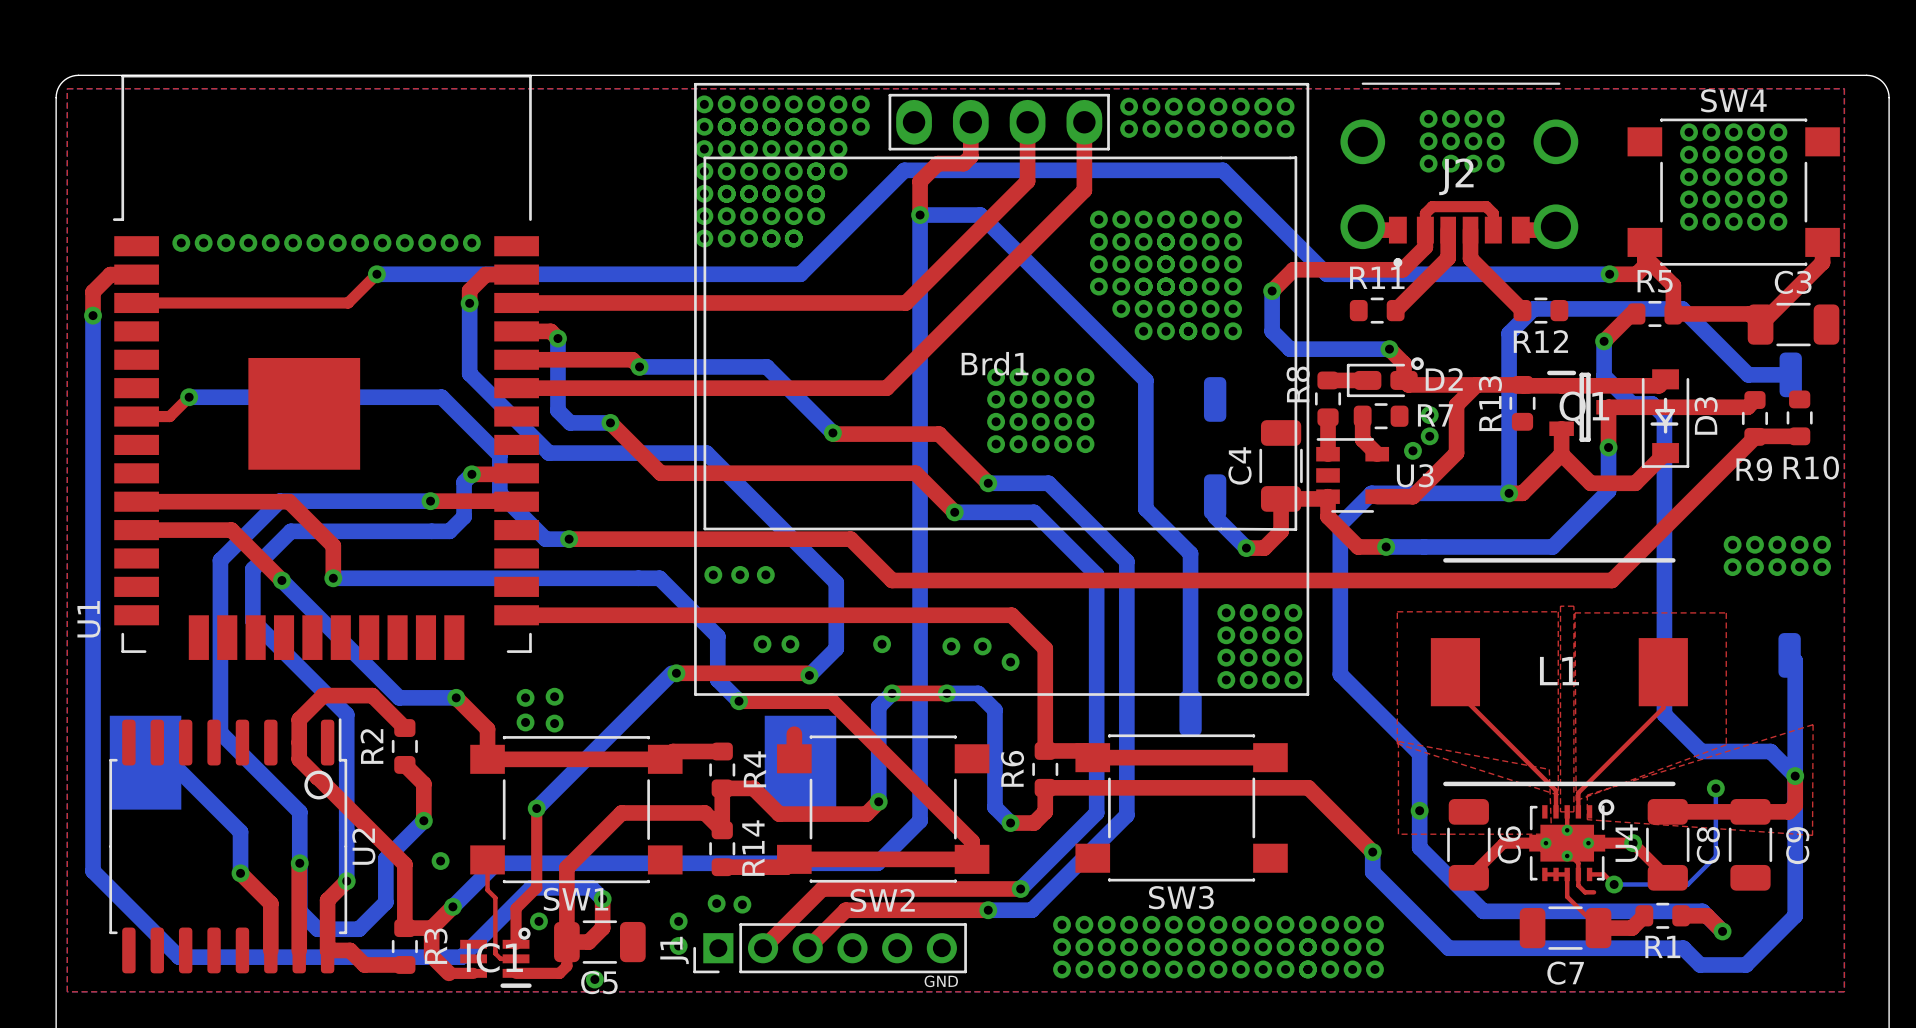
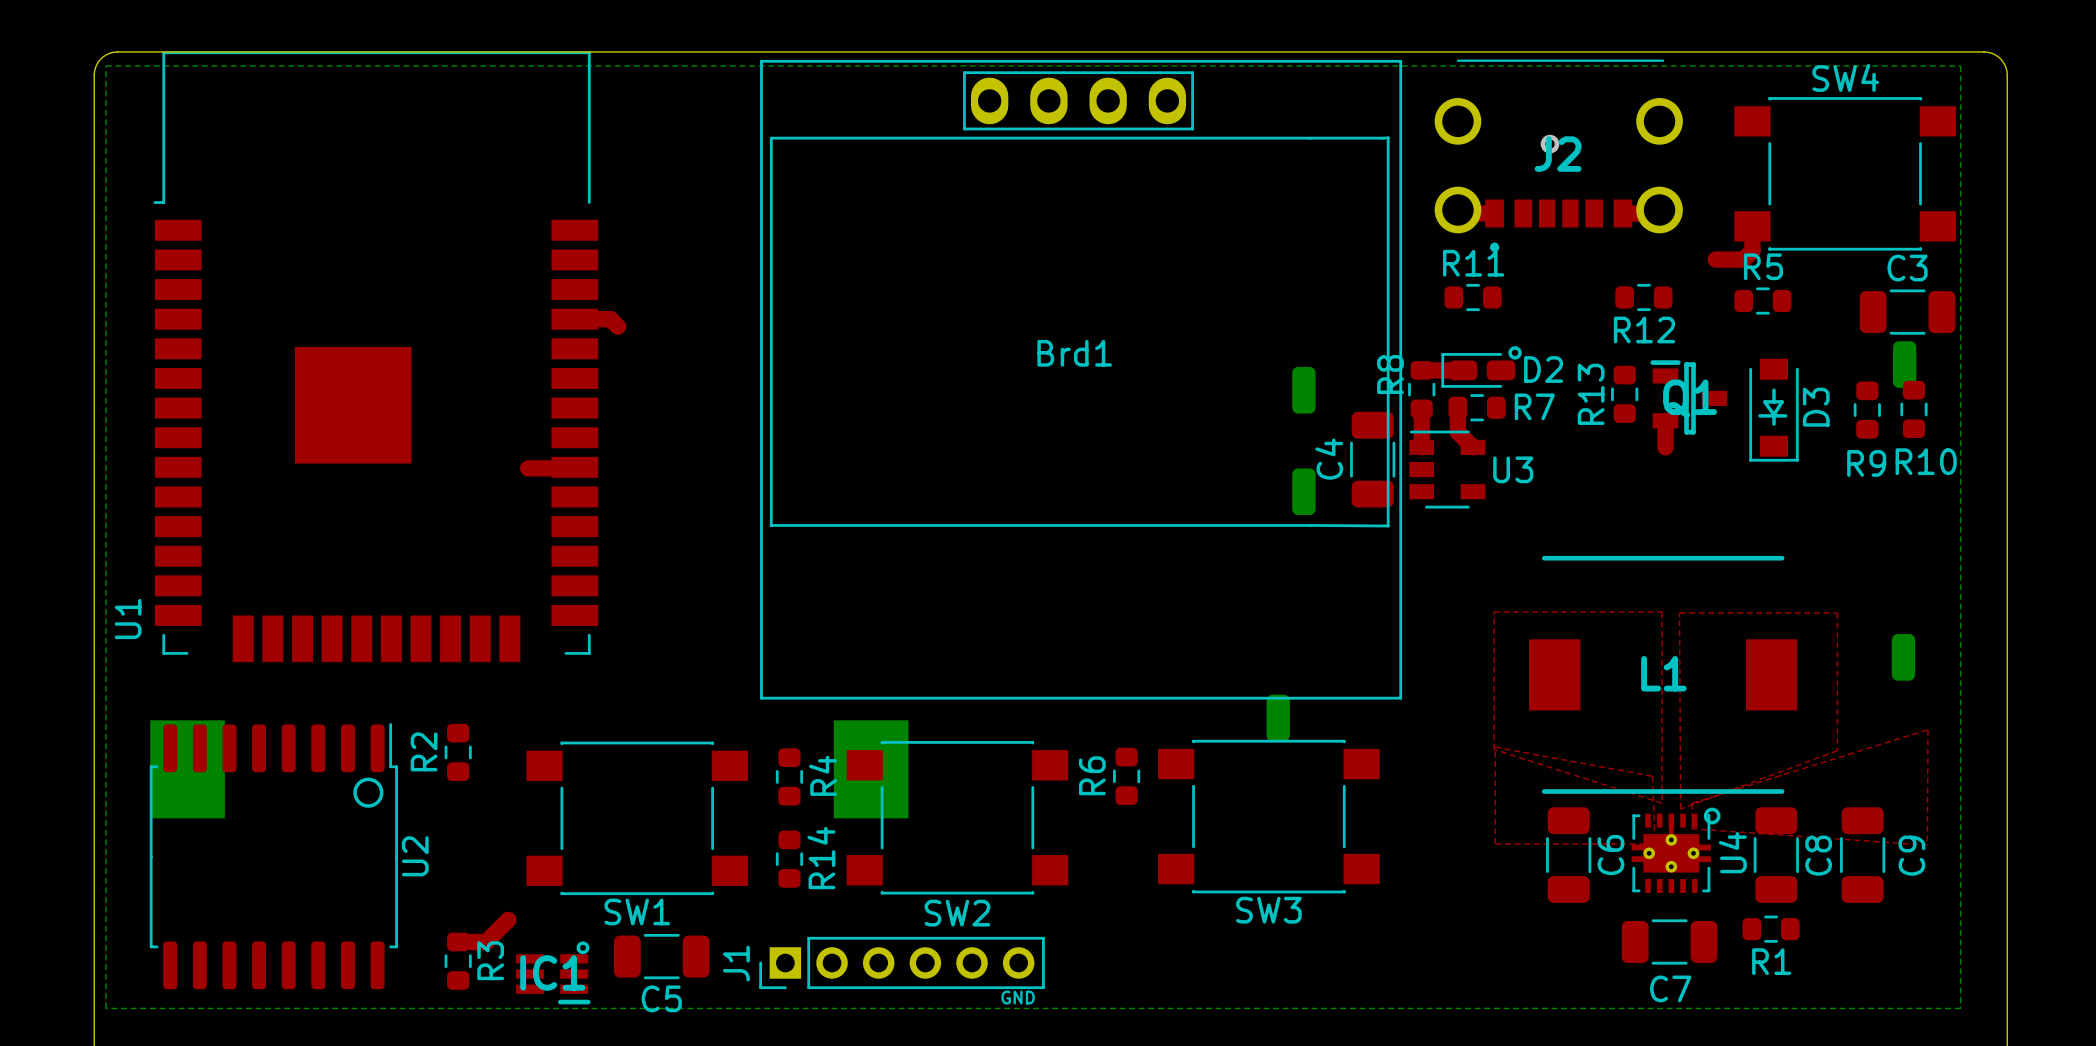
top zone outline: (67, 88) (67, 991) (1844, 991) (1844, 88) (67, 88) -> none
via: (704, 104) -> none
via: (726, 104) -> none
via: (749, 104) -> none
via: (771, 104) -> none
via: (793, 104) -> none
via: (816, 104) -> none
via: (838, 104) -> none
via: (860, 104) -> none
via: (1129, 106) -> none
via: (1151, 106) -> none
via: (1173, 106) -> none
via: (1196, 106) -> none
via: (1218, 106) -> none
via: (1240, 106) -> none
via: (1263, 106) -> none
via: (1285, 106) -> none
via: (1428, 118) -> none
via: (1450, 118) -> none
via: (1473, 118) -> none
via: (1495, 118) -> none
top track: (970, 122) (970, 156) (963, 163) (937, 163) (920, 181) (920, 215) -> none
top track: (1027, 122) (1027, 181) (905, 302) (516, 302) -> none
top track: (1084, 122) (1084, 190) (886, 388) (516, 388) -> none
via: (704, 126) -> none
via: (726, 126) -> none
via: (749, 126) -> none
via: (771, 126) -> none
via: (793, 126) -> none
via: (816, 126) -> none
via: (838, 126) -> none
via: (860, 126) -> none
via: (1129, 128) -> none
via: (1151, 128) -> none
via: (1173, 128) -> none
via: (1196, 128) -> none
via: (1218, 128) -> none
via: (1240, 128) -> none
via: (1263, 128) -> none
via: (1285, 128) -> none
via: (1689, 132) -> none
via: (1711, 132) -> none
via: (1733, 132) -> none
via: (1756, 132) -> none
via: (1778, 132) -> none
via: (1428, 141) -> none
via: (1450, 141) -> none
via: (1473, 141) -> none
via: (1495, 141) -> none
via: (704, 149) -> none
via: (726, 149) -> none
via: (749, 149) -> none
via: (771, 149) -> none
via: (793, 149) -> none
via: (816, 149) -> none
via: (838, 149) -> none
via: (1689, 154) -> none
via: (1711, 154) -> none
via: (1733, 154) -> none
via: (1756, 154) -> none
via: (1778, 154) -> none
via: (1428, 163) -> none
via: (1473, 163) -> none
via: (1495, 163) -> none
via: (704, 171) -> none
via: (726, 171) -> none
via: (749, 171) -> none
via: (771, 171) -> none
via: (793, 171) -> none
via: (816, 171) -> none
via: (838, 171) -> none
via: (1689, 177) -> none
via: (1711, 177) -> none
via: (1733, 177) -> none
via: (1756, 177) -> none
via: (1778, 177) -> none
via: (704, 193) -> none
via: (726, 193) -> none
via: (749, 193) -> none
via: (771, 193) -> none
via: (793, 193) -> none
via: (816, 193) -> none
via: (1689, 199) -> none
via: (1711, 199) -> none
via: (1733, 199) -> none
via: (1756, 199) -> none
via: (1778, 199) -> none
via: (920, 215) -> none
via: (704, 216) -> none
via: (726, 216) -> none
via: (749, 216) -> none
via: (771, 216) -> none
via: (793, 216) -> none
via: (816, 216) -> none
via: (1098, 219) -> none
via: (1121, 219) -> none
via: (1143, 219) -> none
via: (1165, 219) -> none
via: (1188, 219) -> none
via: (1210, 219) -> none
via: (1233, 219) -> none
via: (1689, 221) -> none
via: (1711, 221) -> none
via: (1733, 221) -> none
via: (1756, 221) -> none
via: (1778, 221) -> none
top track: (1448, 230) (1448, 258) (1395, 310) -> none
top track: (1470, 230) (1470, 258) (1522, 310) -> none
top track: (1493, 230) (1493, 213) (1486, 206) (1432, 206) (1425, 213) (1425, 247) (1402, 269) (1293, 269) (1272, 291) -> none
via: (704, 238) -> none
via: (726, 238) -> none
via: (749, 238) -> none
via: (771, 238) -> none
via: (793, 238) -> none
via: (1098, 241) -> none
via: (1121, 241) -> none
via: (1143, 241) -> none
via: (1165, 241) -> none
via: (1188, 241) -> none
via: (1210, 241) -> none
via: (1233, 241) -> none
via: (181, 242) -> none
via: (203, 242) -> none
via: (226, 242) -> none
via: (248, 242) -> none
via: (270, 242) -> none
via: (293, 242) -> none
via: (315, 242) -> none
via: (337, 242) -> none
via: (360, 242) -> none
via: (382, 242) -> none
via: (404, 242) -> none
via: (427, 242) -> none
via: (449, 242) -> none
via: (471, 242) -> none
top track: (1822, 242) (1822, 262) (1760, 324) (1749, 313) (1673, 313) (1673, 285) (1644, 256) -> none
via: (1098, 264) -> none
via: (1121, 264) -> none
via: (1143, 264) -> none
via: (1165, 264) -> none
via: (1188, 264) -> none
via: (1210, 264) -> none
via: (1233, 264) -> none
top track: (136, 274) (110, 274) (93, 292) (93, 315) -> none
top track: (376, 274) (348, 302) (136, 302) -> none
bottom track: (376, 274) (800, 274) (904, 170) (1222, 170) (1326, 274) (1609, 274) -> none
via: (376, 274) -> none
top track: (516, 274) (485, 274) (469, 290) (469, 303) -> none
via: (1609, 274) -> none
via: (1098, 286) -> none
via: (1121, 286) -> none
via: (1143, 286) -> none
via: (1165, 286) -> none
via: (1188, 286) -> none
via: (1210, 286) -> none
via: (1233, 286) -> none
bottom track: (1272, 291) (1272, 331) (1290, 349) (1389, 349) -> none
via: (1272, 291) -> none
bottom track: (469, 303) (469, 373) (549, 453) (706, 453) (836, 582) (836, 648) (809, 675) -> none
via: (469, 303) -> none
via: (1121, 308) -> none
via: (1143, 308) -> none
via: (1165, 308) -> none
via: (1188, 308) -> none
via: (1210, 308) -> none
via: (1233, 308) -> none
top track: (1636, 313) (1631, 313) (1604, 341) -> none
bottom track: (93, 315) (93, 871) (179, 957) (461, 957) (531, 887) (591, 887) (602, 899) -> none
via: (93, 315) -> none
via: (1143, 331) -> none
via: (1165, 331) -> none
via: (1188, 331) -> none
via: (1210, 331) -> none
via: (1233, 331) -> none
bottom track: (557, 338) (557, 410) (570, 422) (610, 422) -> none
via: (557, 338) -> none
bottom track: (1604, 341) (1604, 375) (1632, 403) (1652, 403) (1664, 416) (1664, 714) (1701, 751) (1770, 751) (1795, 776) -> none
via: (1604, 341) -> none
top track: (1389, 349) (1404, 363) (1404, 380) (1408, 384) (1659, 385) (1665, 379) -> none
via: (1389, 349) -> none
top track: (516, 359) (632, 359) (639, 366) -> none
bottom track: (639, 366) (766, 366) (832, 432) -> none
via: (639, 366) -> none
bottom track: (1790, 374) (1748, 374) (1682, 308) (1533, 308) (1509, 333) (1509, 493) (1371, 493) (1340, 524) (1340, 674) (1419, 753) (1419, 847) (1483, 911) (1702, 911) (1722, 931) -> none
via: (996, 377) -> none
via: (1018, 377) -> none
via: (1040, 377) -> none
via: (1063, 377) -> none
via: (1085, 377) -> none
top track: (1476, 384) (1456, 405) (1456, 453) (1412, 496) (1377, 496) -> none
top track: (189, 397) (169, 416) (136, 416) -> none
bottom track: (189, 397) (441, 397) (499, 455) (499, 493) (545, 539) (569, 539) -> none
via: (189, 397) -> none
via: (996, 399) -> none
via: (1018, 399) -> none
via: (1040, 399) -> none
via: (1063, 399) -> none
via: (1085, 399) -> none
top track: (1754, 400) (1747, 407) (1608, 407) (1608, 447) -> none
via: (1429, 415) -> none
via: (996, 421) -> none
via: (1018, 421) -> none
via: (1040, 421) -> none
via: (1063, 421) -> none
via: (1085, 421) -> none
top track: (610, 422) (660, 473) (915, 473) (954, 512) -> none
via: (610, 422) -> none
top track: (832, 432) (939, 434) (988, 483) -> none
via: (832, 432) -> none
via: (1429, 436) -> none
top track: (1799, 436) (1755, 436) (1611, 580) (892, 580) (850, 539) (569, 539) -> none
via: (996, 444) -> none
via: (1018, 444) -> none
via: (1040, 444) -> none
via: (1063, 444) -> none
via: (1085, 444) -> none
bottom track: (1608, 447) (1608, 491) (1552, 546) (1386, 546) -> none
via: (1608, 447) -> none
via: (1412, 450) -> none
top track: (1665, 453) (1635, 483) (1590, 483) (1561, 454) (1522, 493) (1509, 493) -> none
bottom track: (471, 474) (464, 482) (464, 516) (449, 531) (290, 531) (252, 569) (252, 620) (346, 714) (346, 881) -> none
via: (471, 474) -> none
bottom track: (988, 483) (1048, 483) (1126, 561) (1126, 815) (1031, 910) (988, 910) -> none
via: (988, 483) -> none
via: (1509, 493) -> none
bottom track: (1215, 496) (1215, 516) (1246, 548) -> none
top track: (136, 501) (289, 501) (333, 545) (333, 578) -> none
top track: (430, 501) (516, 501) -> none
bottom track: (430, 501) (279, 501) (220, 560) (220, 732) (299, 812) (299, 911) (317, 929) (359, 929) (385, 902) (385, 858) (423, 820) -> none
via: (430, 501) -> none
bottom track: (954, 512) (1034, 512) (1096, 574) (1096, 812) (1020, 888) -> none
via: (954, 512) -> none
top track: (136, 530) (231, 530) (281, 580) -> none
via: (569, 539) -> none
via: (1732, 544) -> none
via: (1754, 544) -> none
via: (1777, 544) -> none
via: (1799, 544) -> none
via: (1822, 544) -> none
top track: (1386, 546) (1358, 546) (1328, 516) (1328, 496) (1325, 498) (1281, 498) (1281, 531) (1264, 548) (1246, 548) -> none
via: (1386, 546) -> none
via: (1246, 548) -> none
via: (1732, 567) -> none
via: (1754, 567) -> none
via: (1777, 567) -> none
via: (1799, 567) -> none
via: (1822, 567) -> none
via: (713, 574) -> none
via: (740, 574) -> none
via: (765, 574) -> none
bottom track: (333, 578) (659, 578) (717, 636) (717, 679) (739, 701) -> none
via: (333, 578) -> none
bottom track: (281, 580) (399, 697) (456, 697) -> none
via: (281, 580) -> none
top zone outline: (1560, 606) (1560, 811) (1573, 811) (1573, 606) (1560, 606) -> none
via: (1226, 612) -> none
via: (1248, 612) -> none
via: (1271, 612) -> none
via: (1293, 612) -> none
top track: (516, 615) (1011, 615) (1045, 648) (1045, 750) (1086, 750) (1092, 757) (1270, 757) -> none
via: (1226, 635) -> none
via: (1248, 635) -> none
via: (1271, 635) -> none
via: (1293, 635) -> none
via: (762, 644) -> none
via: (790, 644) -> none
via: (882, 644) -> none
via: (951, 646) -> none
via: (982, 646) -> none
bottom track: (1789, 655) (1795, 660) (1795, 915) (1746, 964) (1700, 964) (1683, 948) (1448, 948) (1372, 872) (1372, 852) -> none
via: (1226, 657) -> none
via: (1248, 657) -> none
via: (1271, 657) -> none
via: (1293, 657) -> none
via: (1010, 662) -> none
top track: (1455, 672) (1455, 690) (1556, 790) (1556, 811) -> none
top track: (1663, 672) (1663, 707) (1578, 792) (1578, 811) -> none
top track: (676, 673) (807, 673) (809, 675) -> none
bottom track: (676, 673) (671, 673) (536, 808) -> none
via: (676, 673) -> none
via: (809, 675) -> none
via: (1226, 679) -> none
via: (1248, 679) -> none
via: (1271, 679) -> none
via: (1293, 679) -> none
top track: (892, 693) (946, 693) -> none
bottom track: (892, 693) (878, 706) (878, 801) -> none
via: (892, 693) -> none
bottom track: (946, 693) (978, 693) (994, 710) (994, 807) (1010, 823) -> none
via: (946, 693) -> none
via: (554, 696) -> none
top track: (456, 697) (487, 729) (487, 759) (665, 759) (673, 751) (722, 751) -> none
via: (456, 697) -> none
via: (525, 697) -> none
top track: (739, 701) (831, 701) (972, 841) (972, 859) (794, 859) (786, 867) (722, 867) -> none
via: (739, 701) -> none
bottom track: (1190, 713) (1190, 553) (1145, 508) (1145, 380) (980, 215) (920, 215) (920, 820) (877, 863) (496, 863) (452, 906) -> none
via: (525, 722) -> none
via: (554, 723) -> none
top track: (404, 728) (372, 695) (323, 695) (299, 719) (299, 759) (317, 777) -> none
top track: (794, 734) (794, 758) -> none
bottom track: (145, 762) (171, 762) (240, 831) (240, 873) -> none
top track: (404, 764) (423, 783) (423, 820) -> none
top track: (1795, 776) (1795, 805) (1788, 811) (1667, 811) -> none
via: (1795, 776) -> none
top track: (318, 777) (404, 864) (404, 928) (423, 928) -> none
bottom track: (1715, 788) (1715, 856) (1687, 884) (1614, 884) -> none
via: (1715, 788) -> none
top track: (878, 801) (866, 814) (779, 814) (753, 788) (722, 788) (722, 830) (704, 812) (621, 812) (566, 867) (566, 942) -> none
via: (878, 801) -> none
top track: (536, 808) (536, 887) (516, 908) (516, 944) -> none
via: (536, 808) -> none
via: (1419, 810) -> none
via: (423, 820) -> none
top track: (1010, 823) (1034, 823) (1045, 811) (1045, 787) (1308, 787) (1372, 852) -> none
via: (1010, 823) -> none
top track: (1545, 843) (1503, 843) (1468, 877) -> none
top track: (1588, 843) (1633, 843) (1667, 877) -> none
via: (1633, 843) -> none
via: (1372, 852) -> none
top track: (1567, 856) (1571, 856) (1578, 863) (1578, 885) (1585, 892) (1594, 892) -> none
top track: (487, 859) (487, 890) (495, 897) (495, 953) (500, 958) (516, 958) -> none
via: (440, 861) -> none
top track: (299, 863) (299, 950) -> none
via: (299, 863) -> none
top track: (240, 873) (270, 903) (270, 950) -> none
via: (240, 873) -> none
top track: (1544, 874) (1567, 874) (1567, 896) (1598, 928) (1632, 928) (1644, 915) -> none
top track: (1589, 874) (1604, 874) (1614, 884) -> none
top track: (346, 881) (327, 900) (327, 950) (350, 950) (364, 964) (404, 964) -> none
via: (346, 881) -> none
via: (1614, 884) -> none
top track: (1020, 888) (822, 888) (763, 948) -> none
via: (1020, 888) -> none
top track: (602, 899) (602, 928) (588, 942) (566, 942) -> none
via: (602, 899) -> none
via: (716, 903) -> none
via: (742, 904) -> none
via: (452, 906) -> none
top track: (988, 910) (845, 910) (807, 948) -> none
via: (988, 910) -> none
top track: (1681, 915) (1706, 915) (1722, 931) -> none
via: (538, 921) -> none
via: (678, 921) -> none
via: (1062, 924) -> none
via: (1084, 924) -> none
via: (1106, 924) -> none
via: (1129, 924) -> none
via: (1151, 924) -> none
via: (1173, 924) -> none
via: (1196, 924) -> none
via: (1218, 924) -> none
via: (1240, 924) -> none
via: (1263, 924) -> none
via: (1285, 924) -> none
via: (1307, 924) -> none
via: (1330, 924) -> none
via: (1352, 924) -> none
via: (1374, 924) -> none
top track: (431, 928) (431, 956) (448, 973) (473, 973) -> none
via: (1722, 931) -> none
top track: (566, 942) (566, 966) (559, 973) (516, 973) -> none
via: (678, 945) -> none
via: (1062, 947) -> none
via: (1084, 947) -> none
via: (1106, 947) -> none
via: (1129, 947) -> none
via: (1151, 947) -> none
via: (1173, 947) -> none
via: (1196, 947) -> none
via: (1218, 947) -> none
via: (1240, 947) -> none
via: (1263, 947) -> none
via: (1285, 947) -> none
via: (1307, 947) -> none
via: (1330, 947) -> none
via: (1352, 947) -> none
via: (1374, 947) -> none
via: (1062, 969) -> none
via: (1084, 969) -> none
via: (1106, 969) -> none
via: (1129, 969) -> none
via: (1151, 969) -> none
via: (1173, 969) -> none
via: (1196, 969) -> none
via: (1218, 969) -> none
via: (1240, 969) -> none
via: (1263, 969) -> none
via: (1285, 969) -> none
via: (1307, 969) -> none
via: (1330, 969) -> none
via: (1352, 969) -> none
via: (1374, 969) -> none
via: (594, 979) -> none

